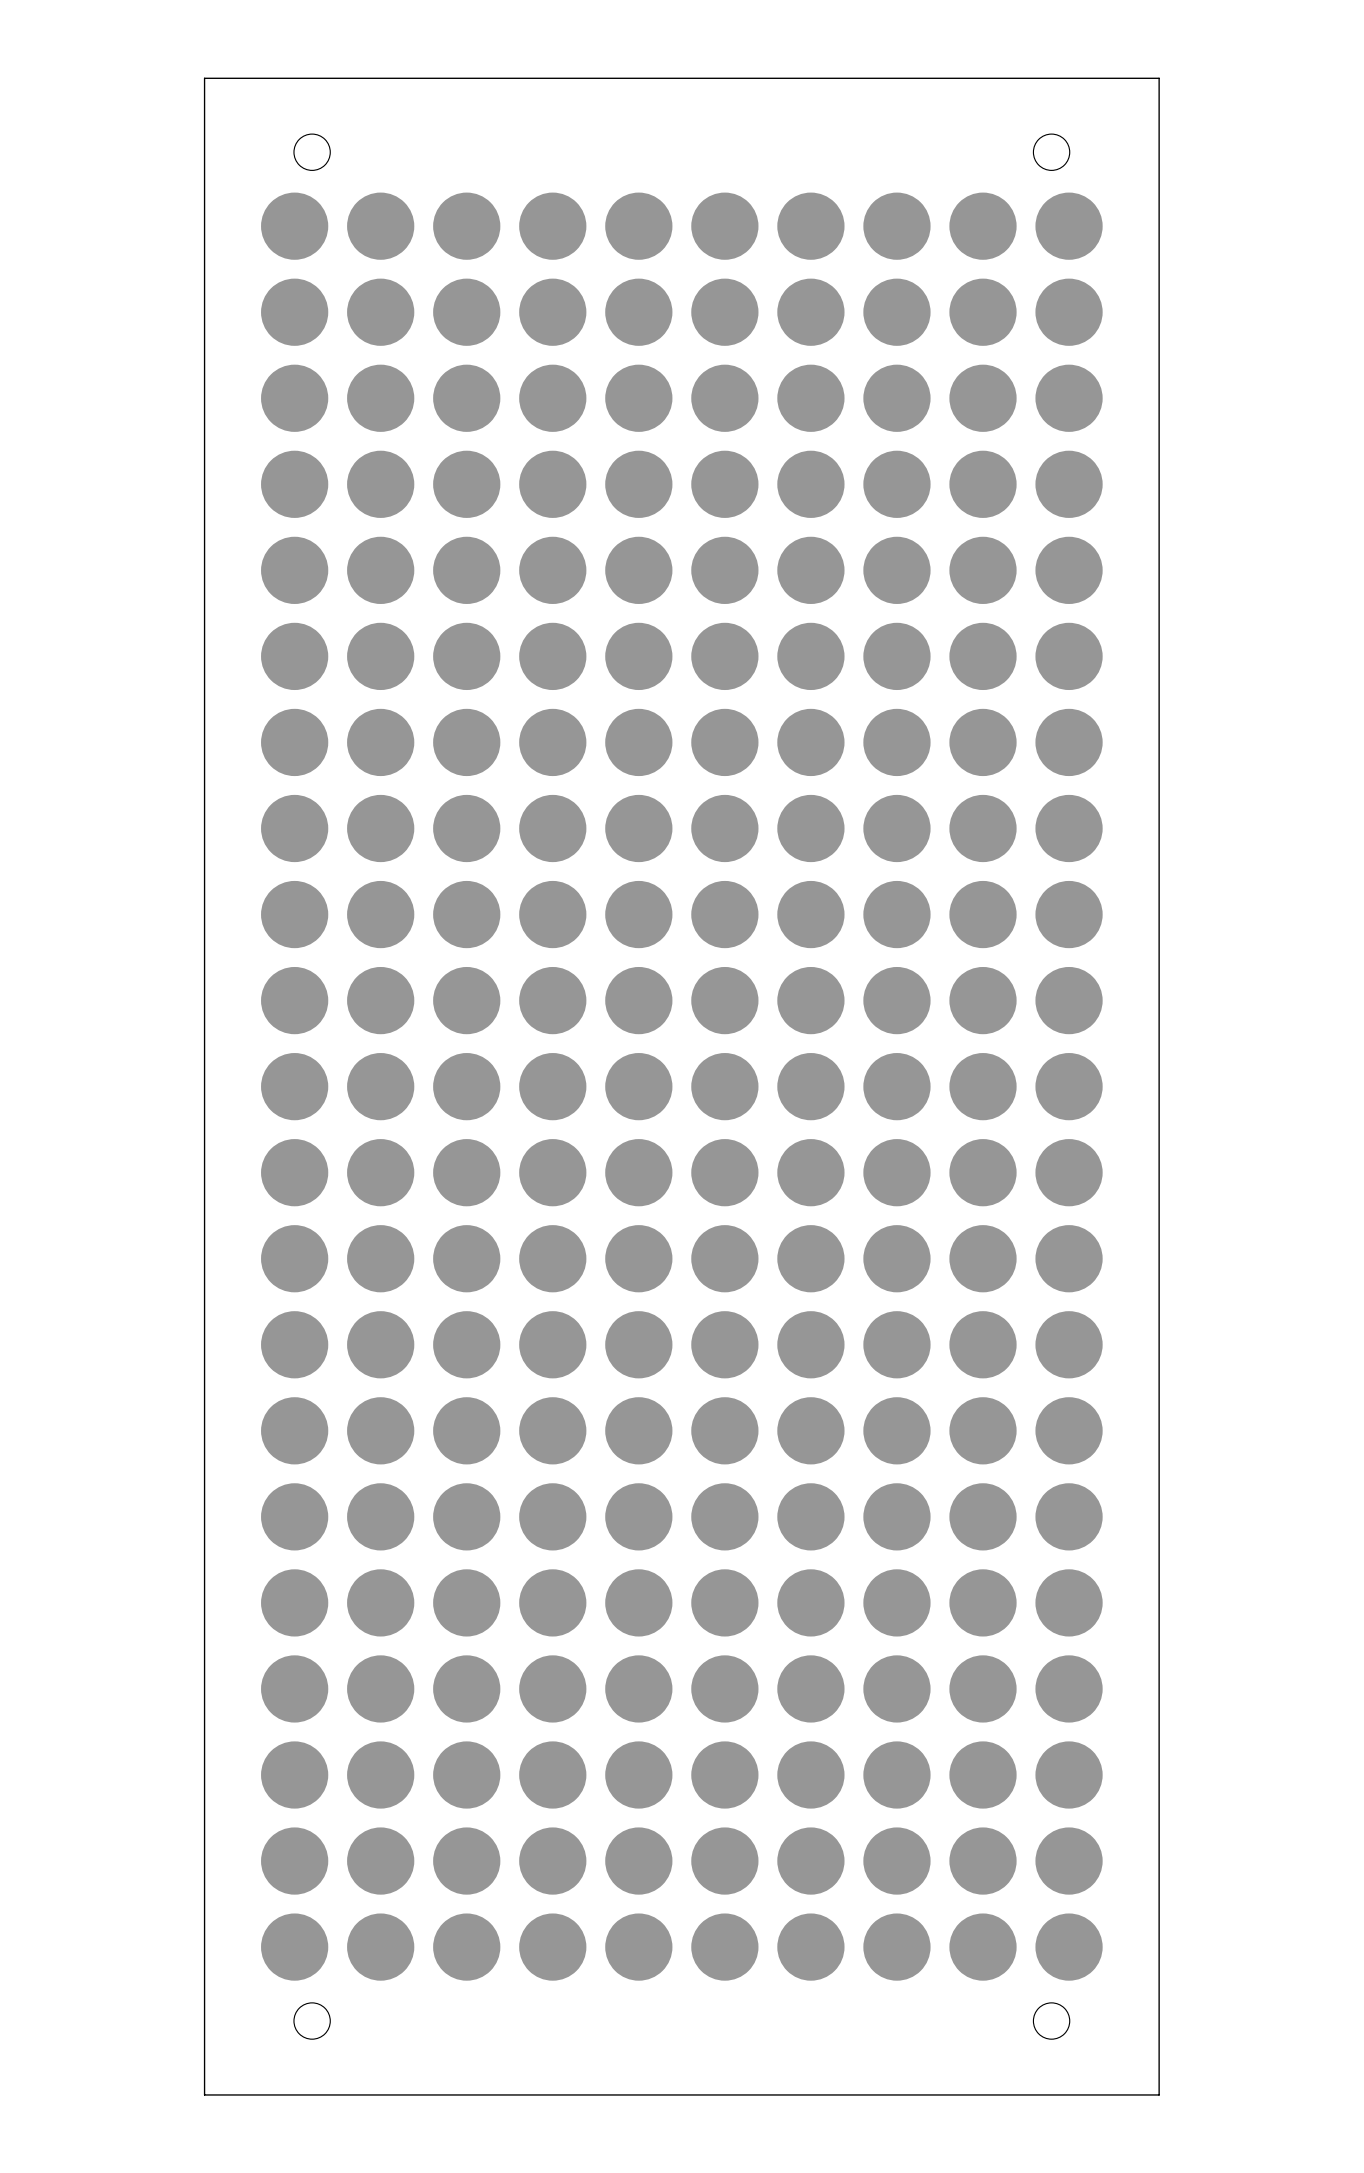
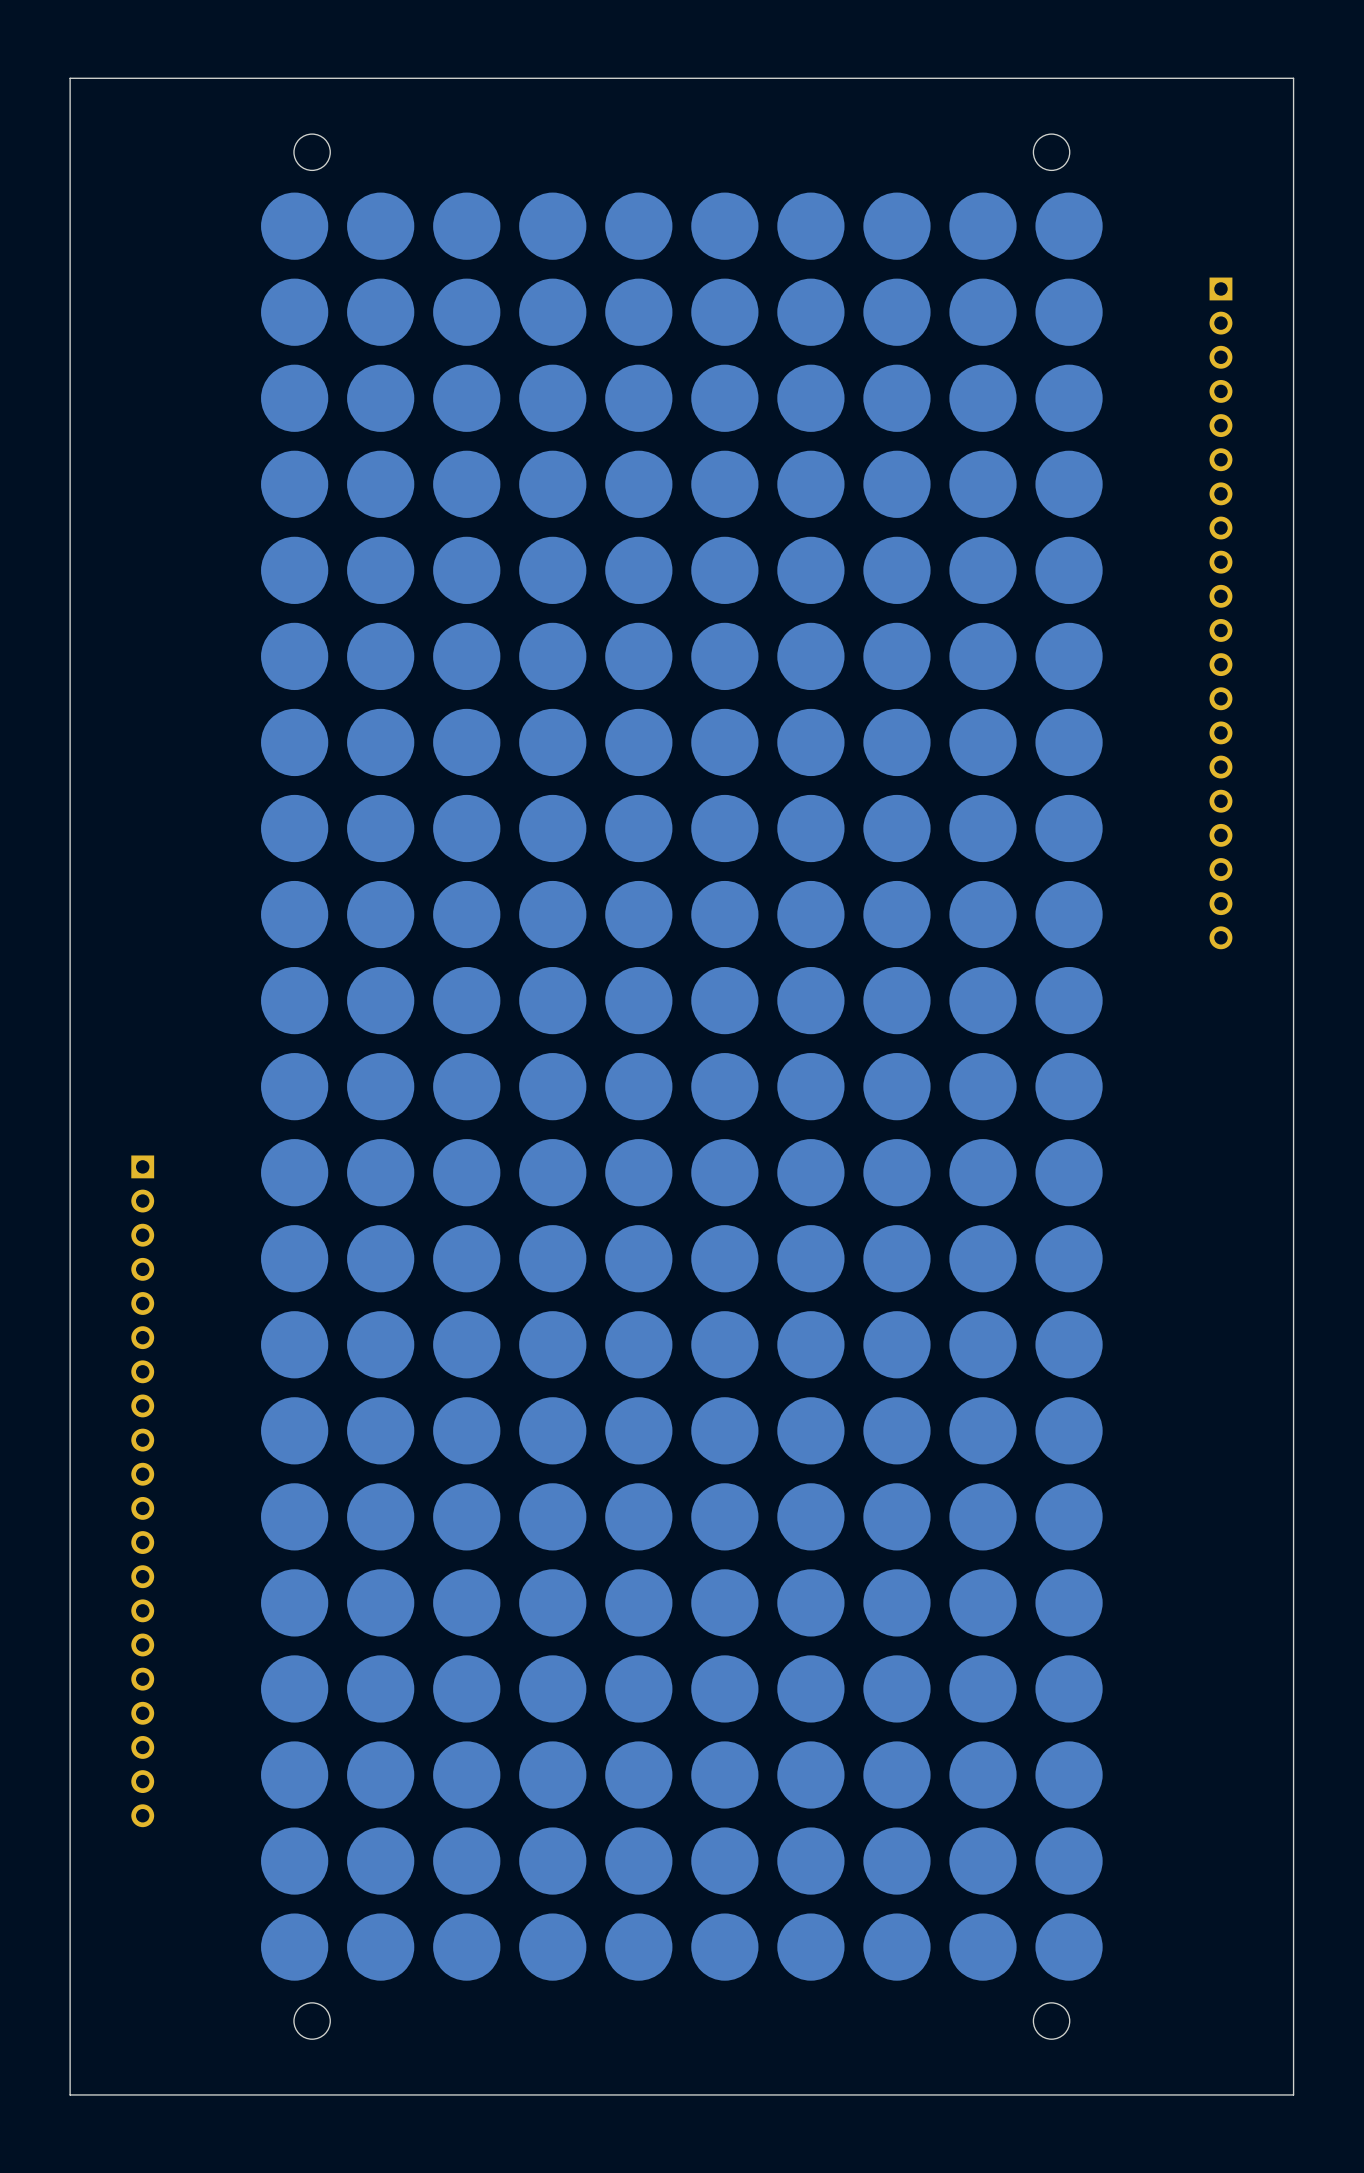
board edge: (204, 78) (204, 2094) -> (204, 78) (70, 78) (70, 2094) (204, 2094)
board edge: (1159, 78) (1159, 2094) -> (1159, 78) (1293, 78) (1293, 2094) (1159, 2094)
part: none -> (1220, 613)
part: none -> (142, 1491)

